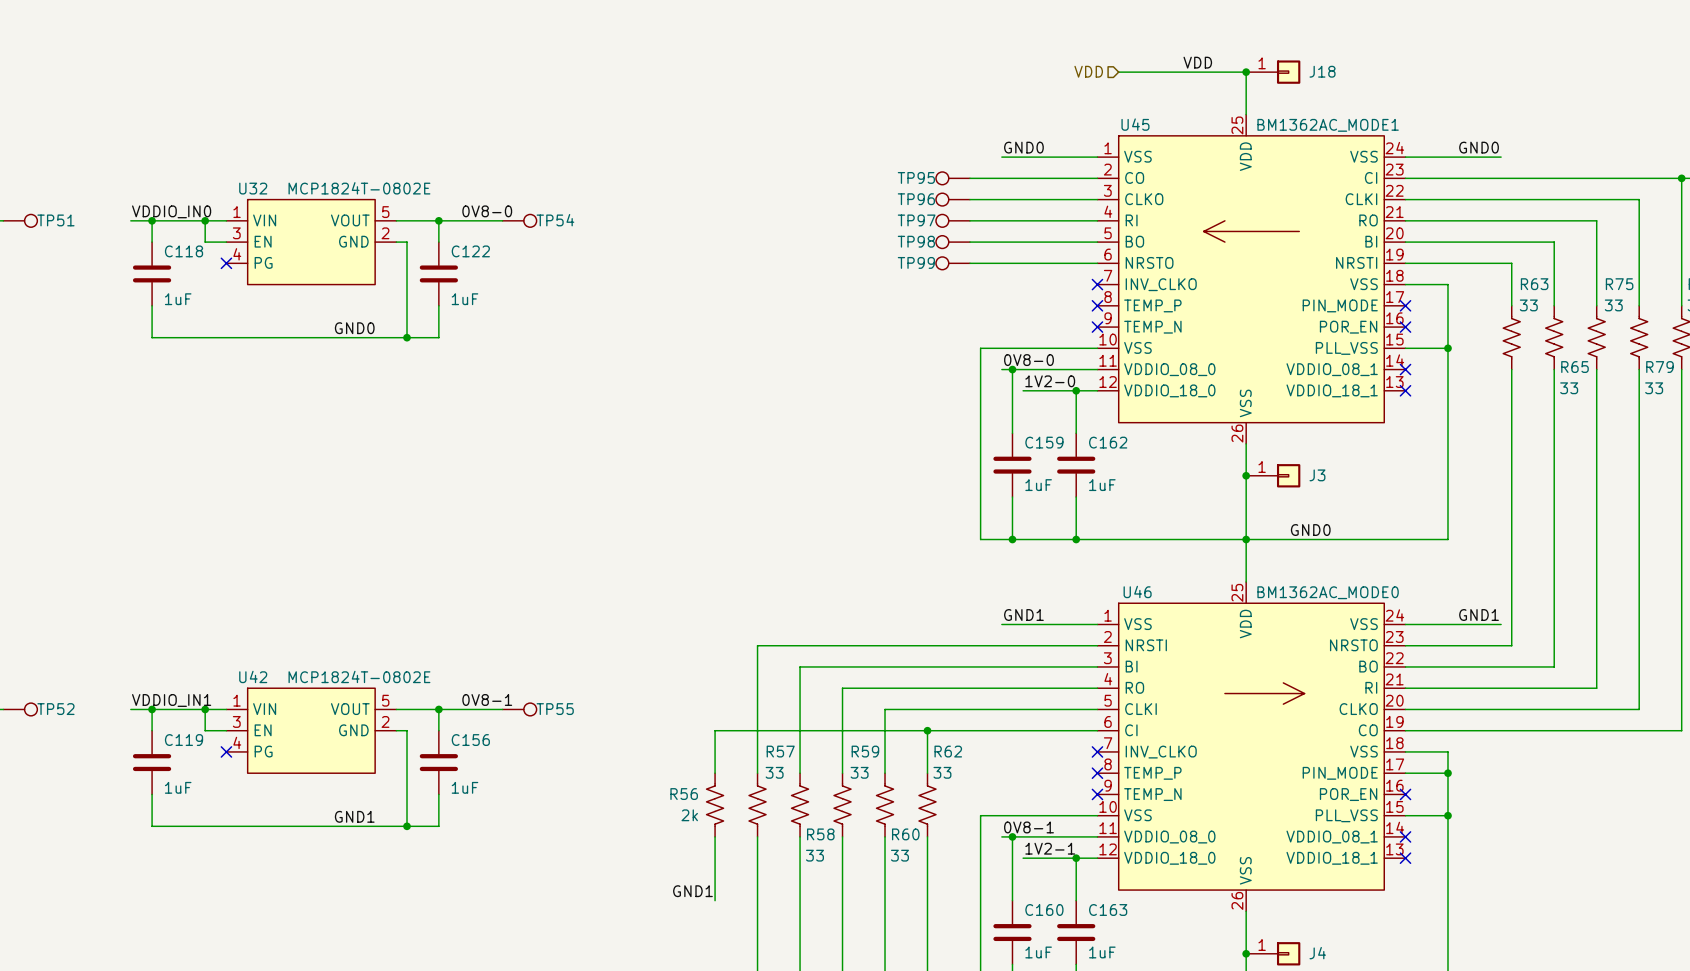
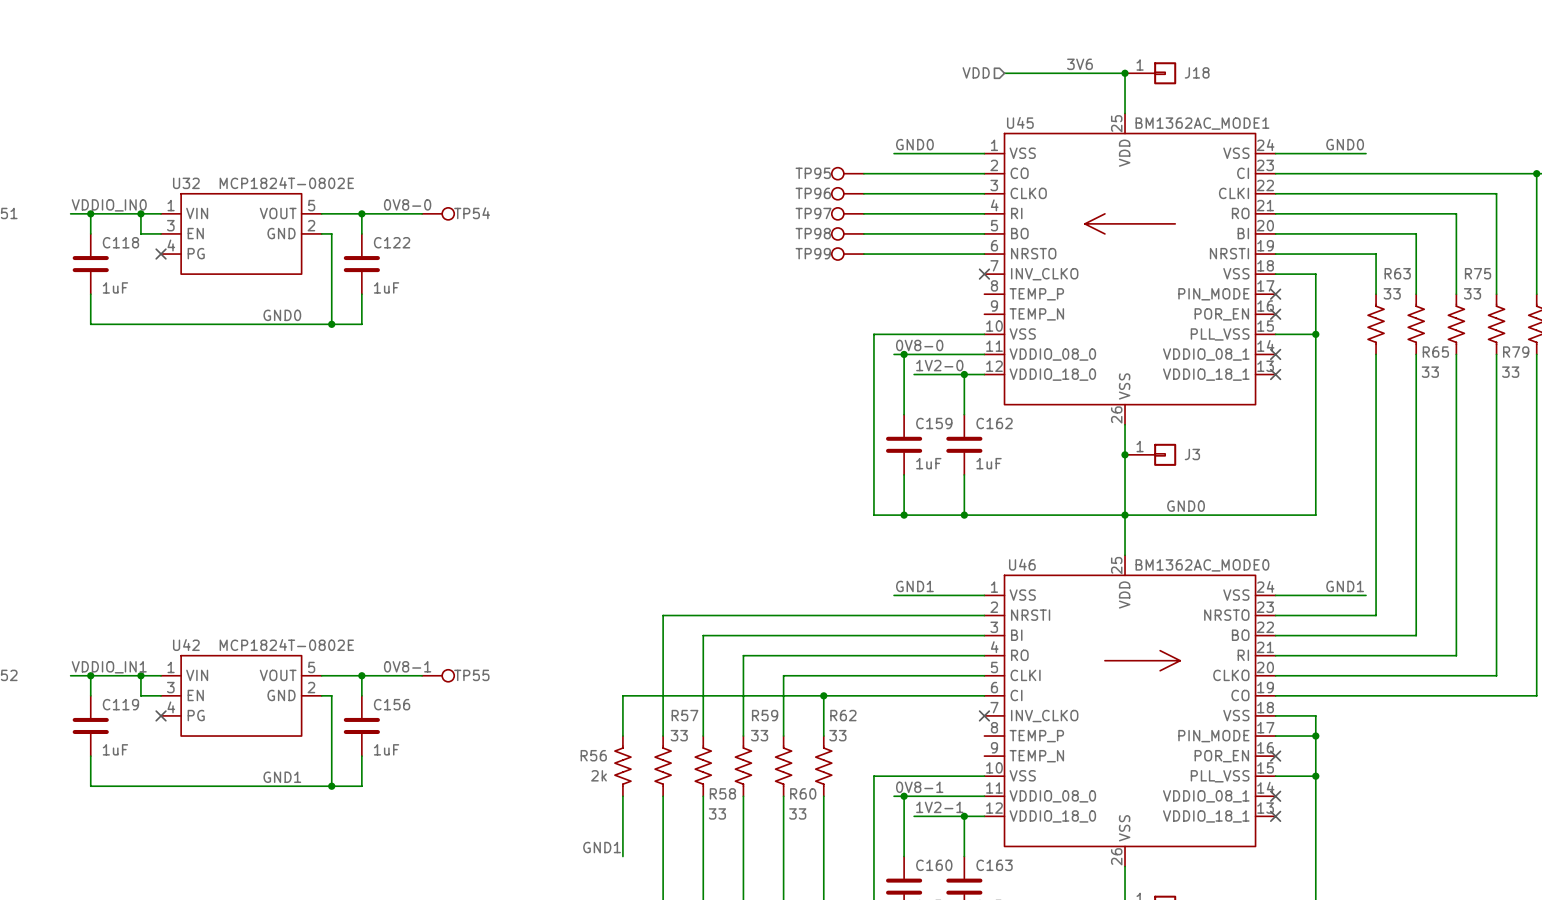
label: VDD (1197, 62) -> 3V6 (1079, 64)
no-connect mark: (1097, 305) -> none
no-connect mark: (1097, 327) -> none
no-connect mark: (1097, 773) -> none
no-connect mark: (1097, 794) -> none

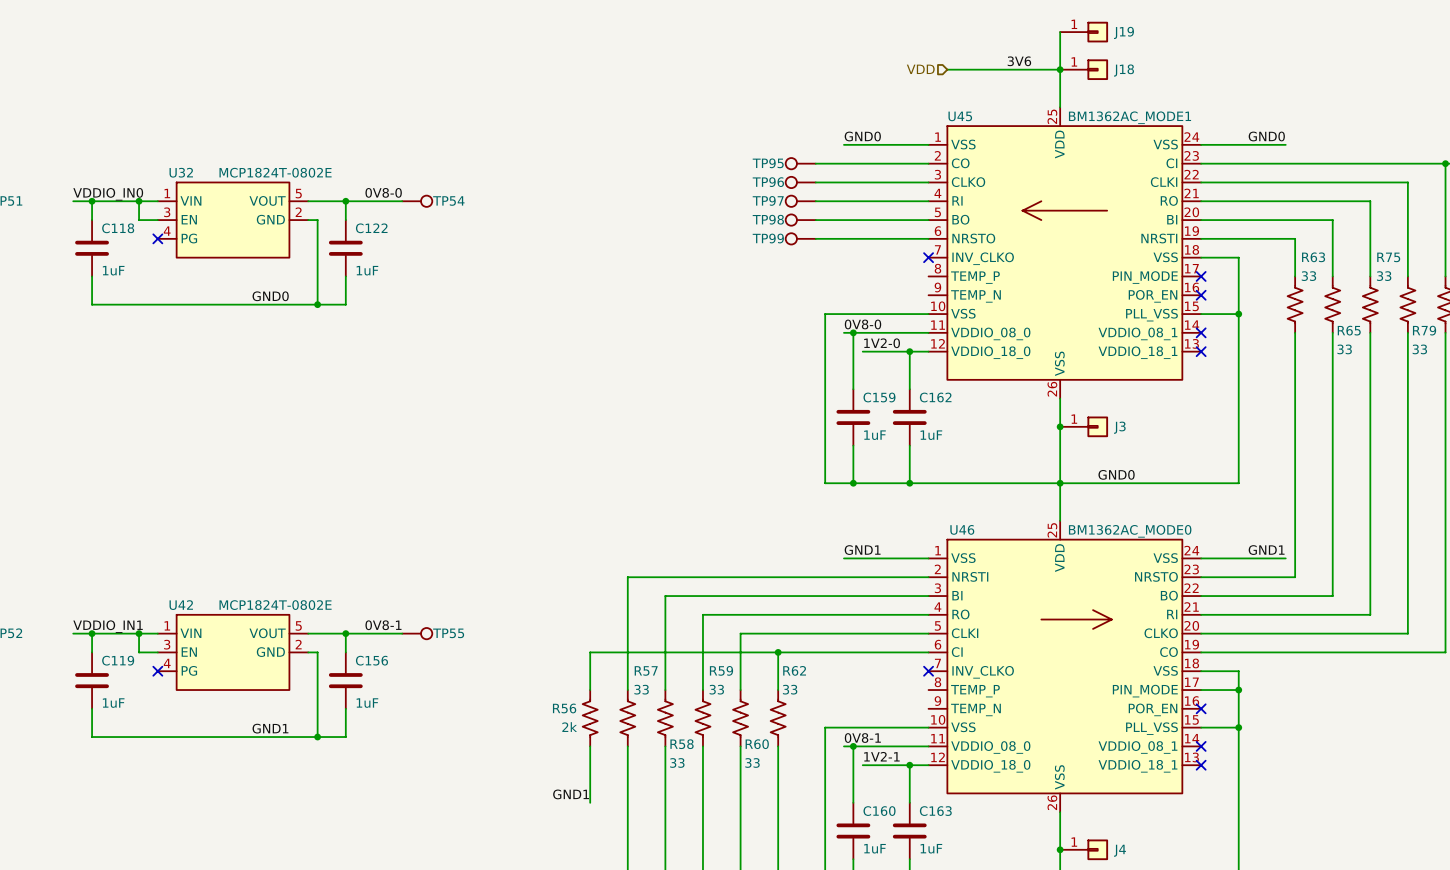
wire: none -> (1060, 32) (1060, 69)
J19: none -> (1084, 32)

